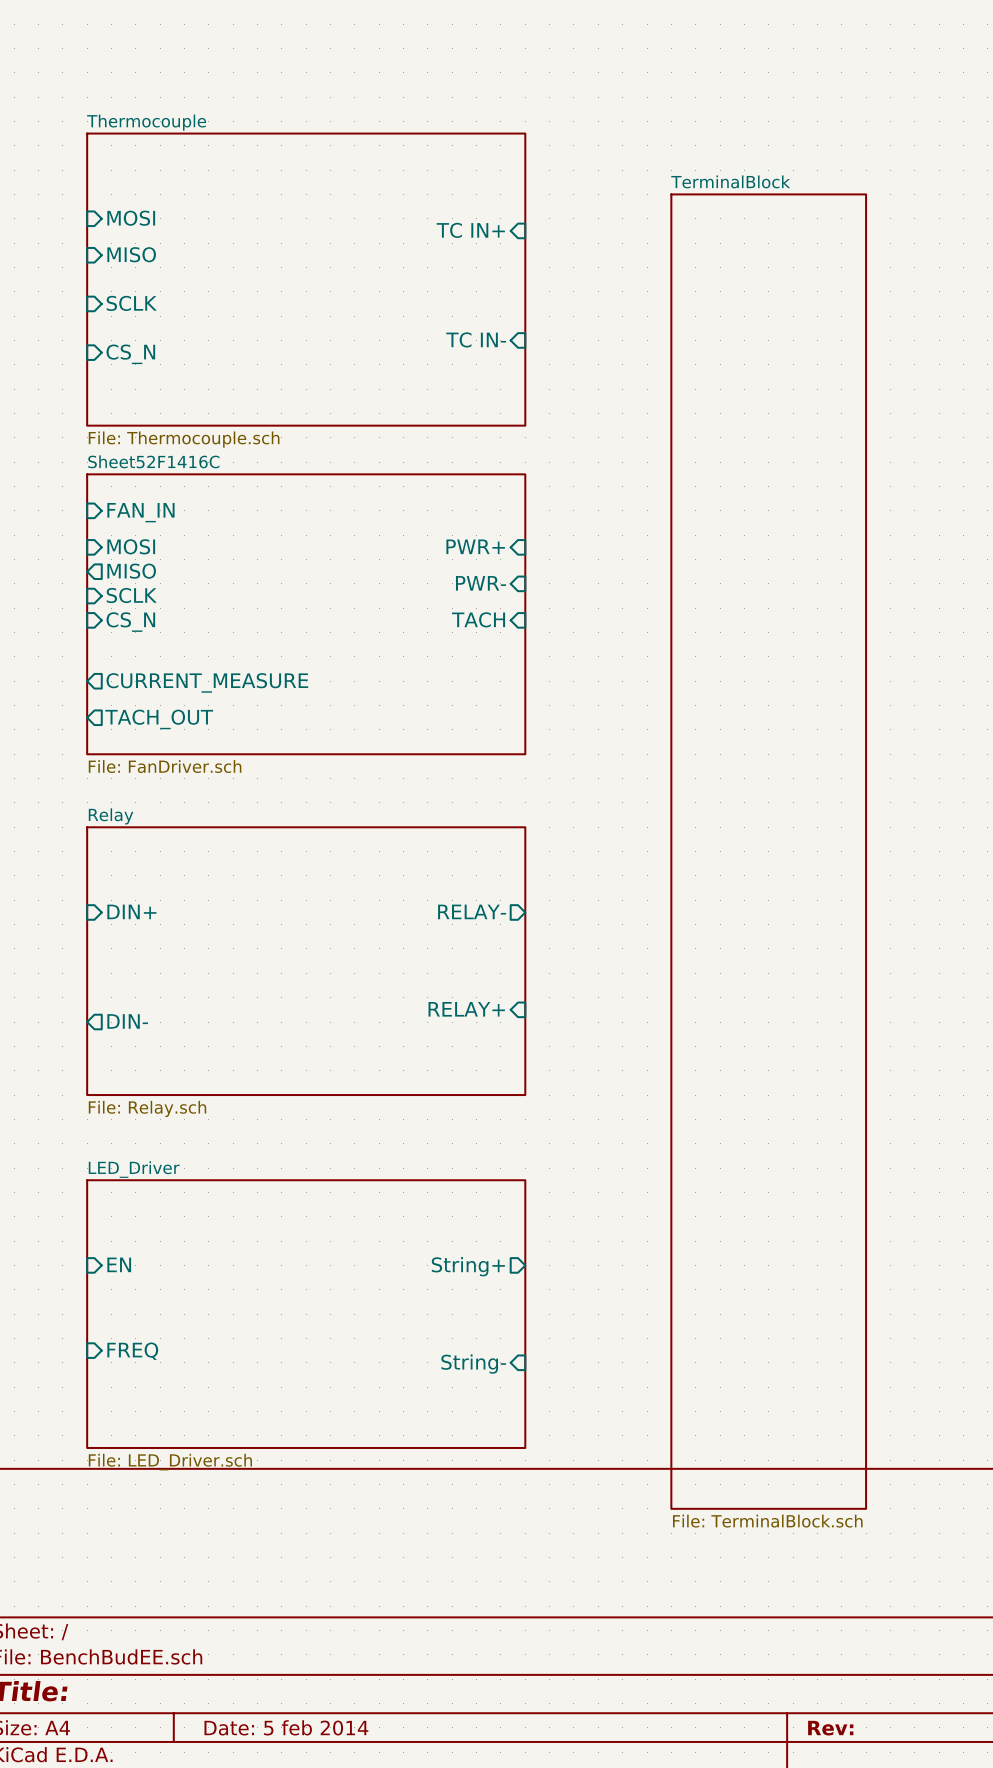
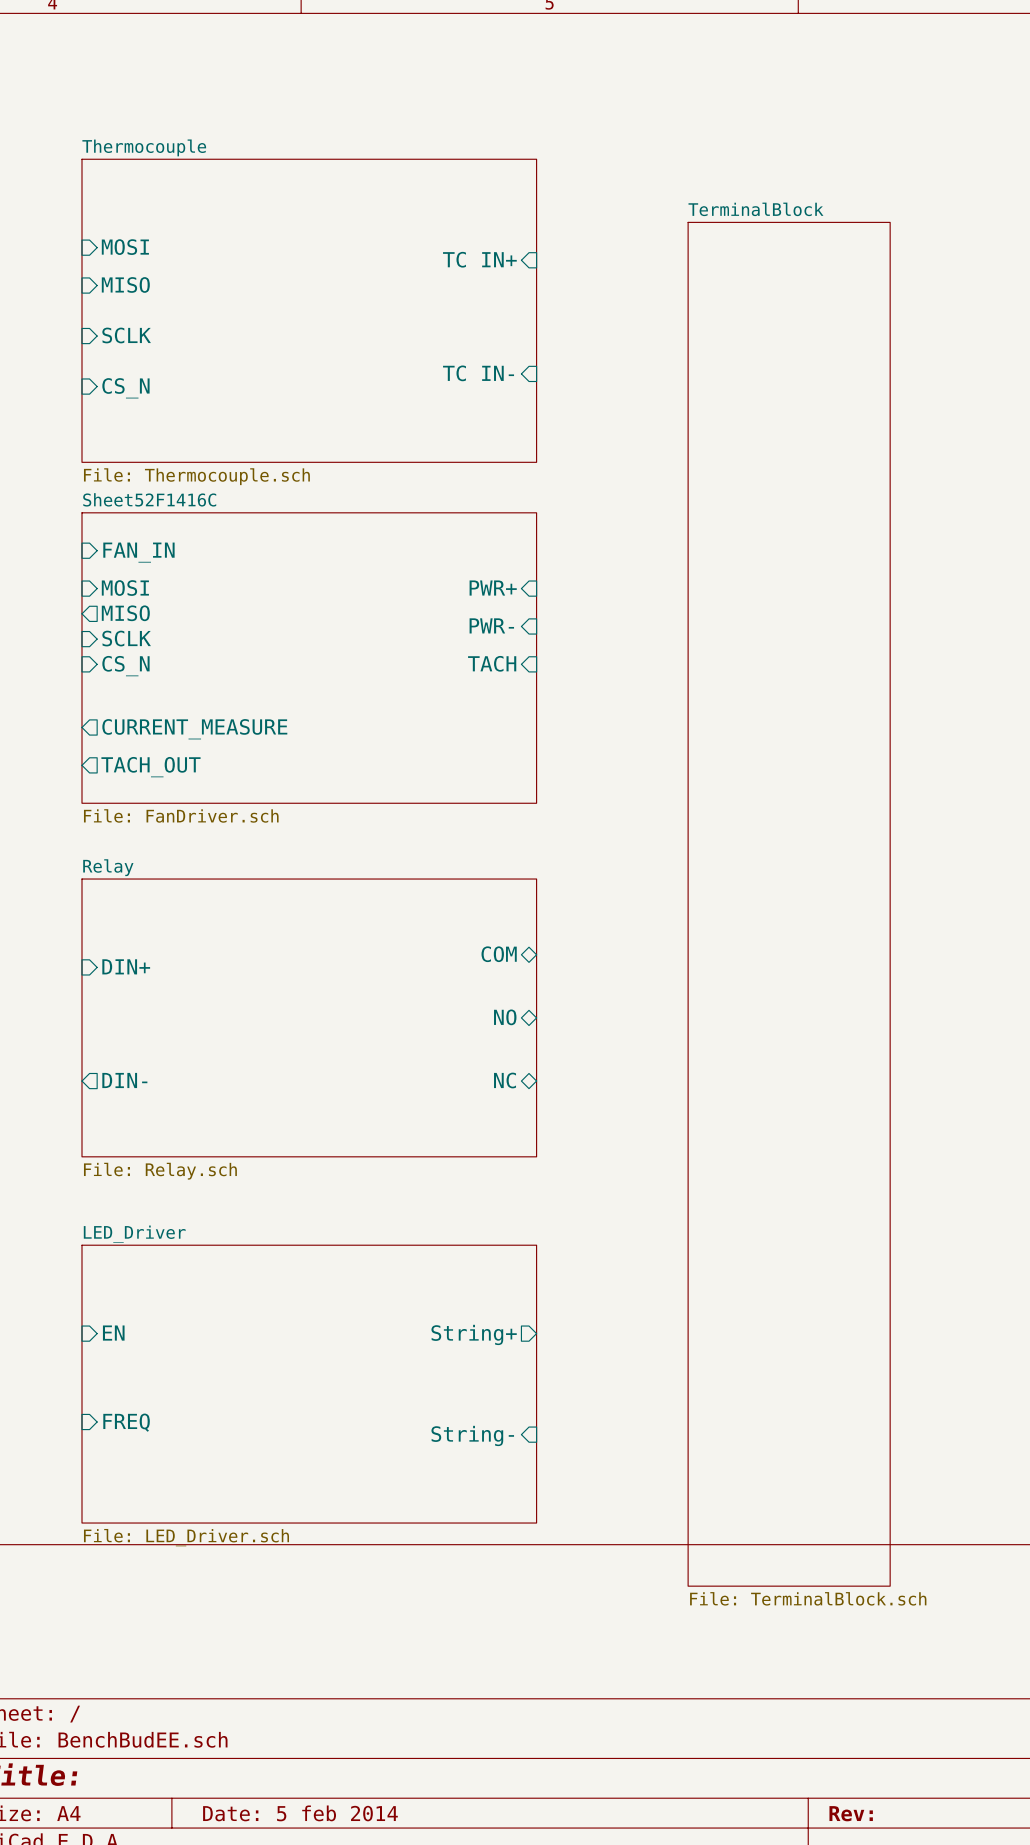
sheet pin: none -> COM (499, 954)
sheet pin: RELAY- (472, 911) -> none
sheet pin: none -> NO (505, 1017)
sheet pin: RELAY+ (466, 1009) -> none
sheet pin: none -> NC (505, 1080)

